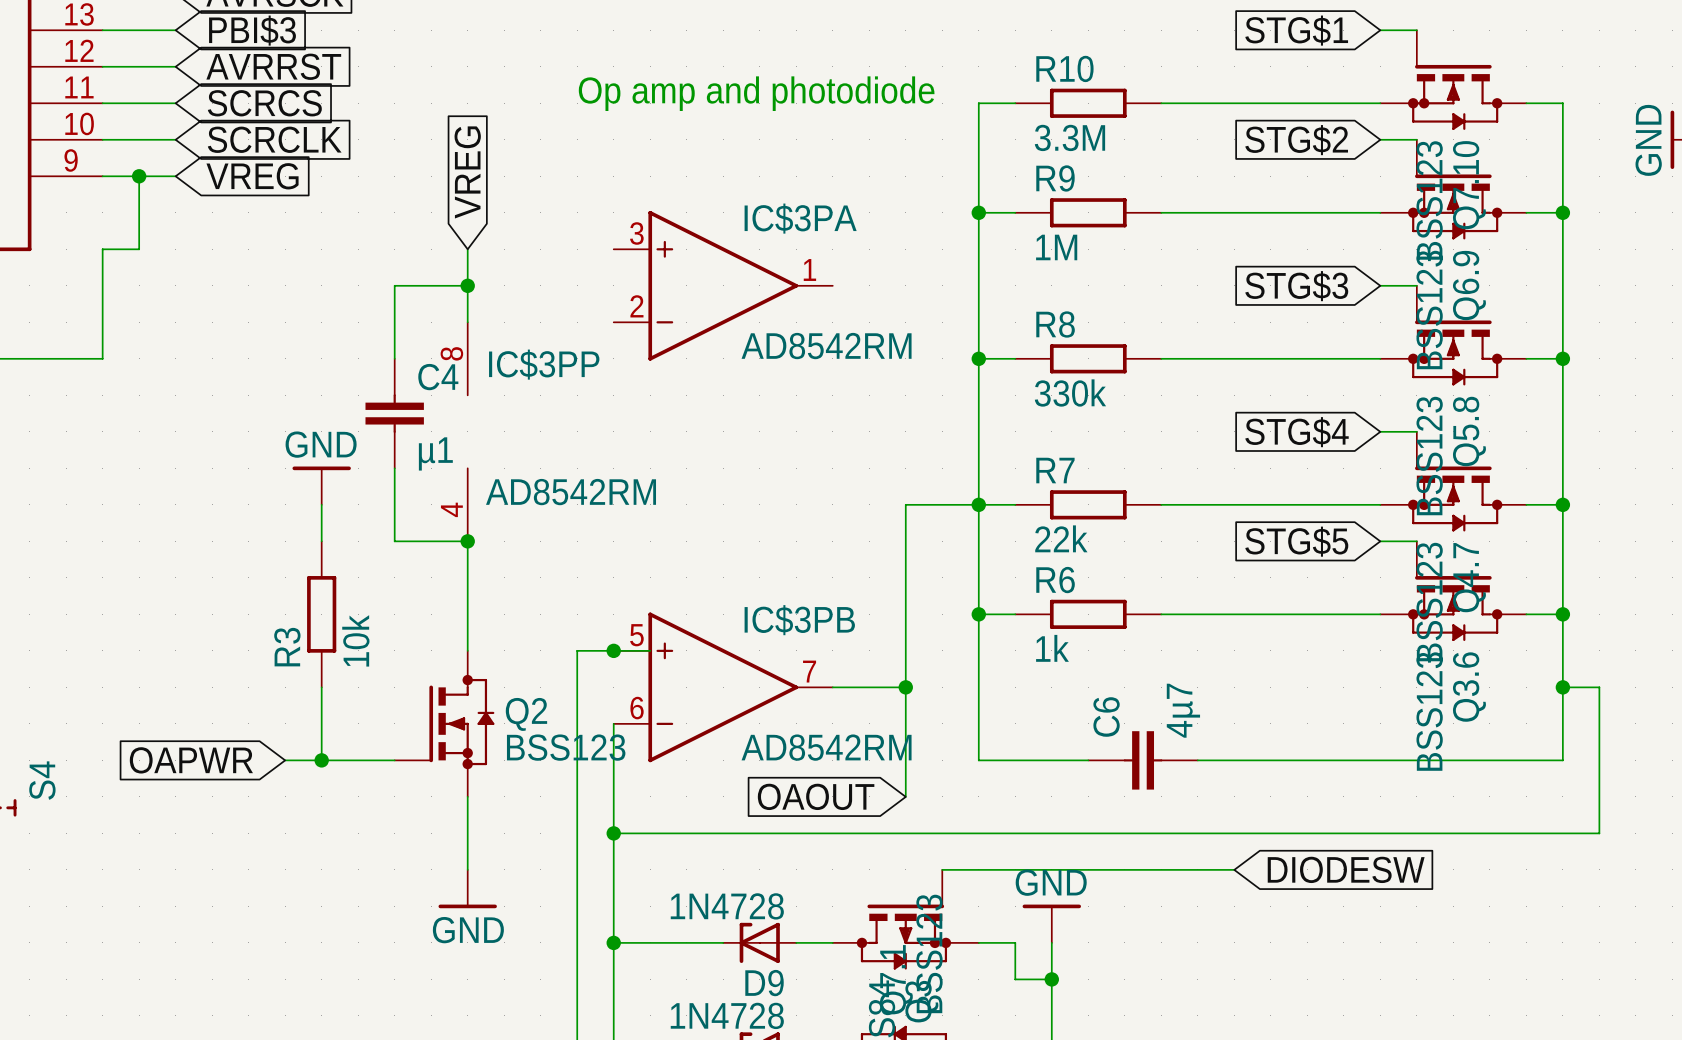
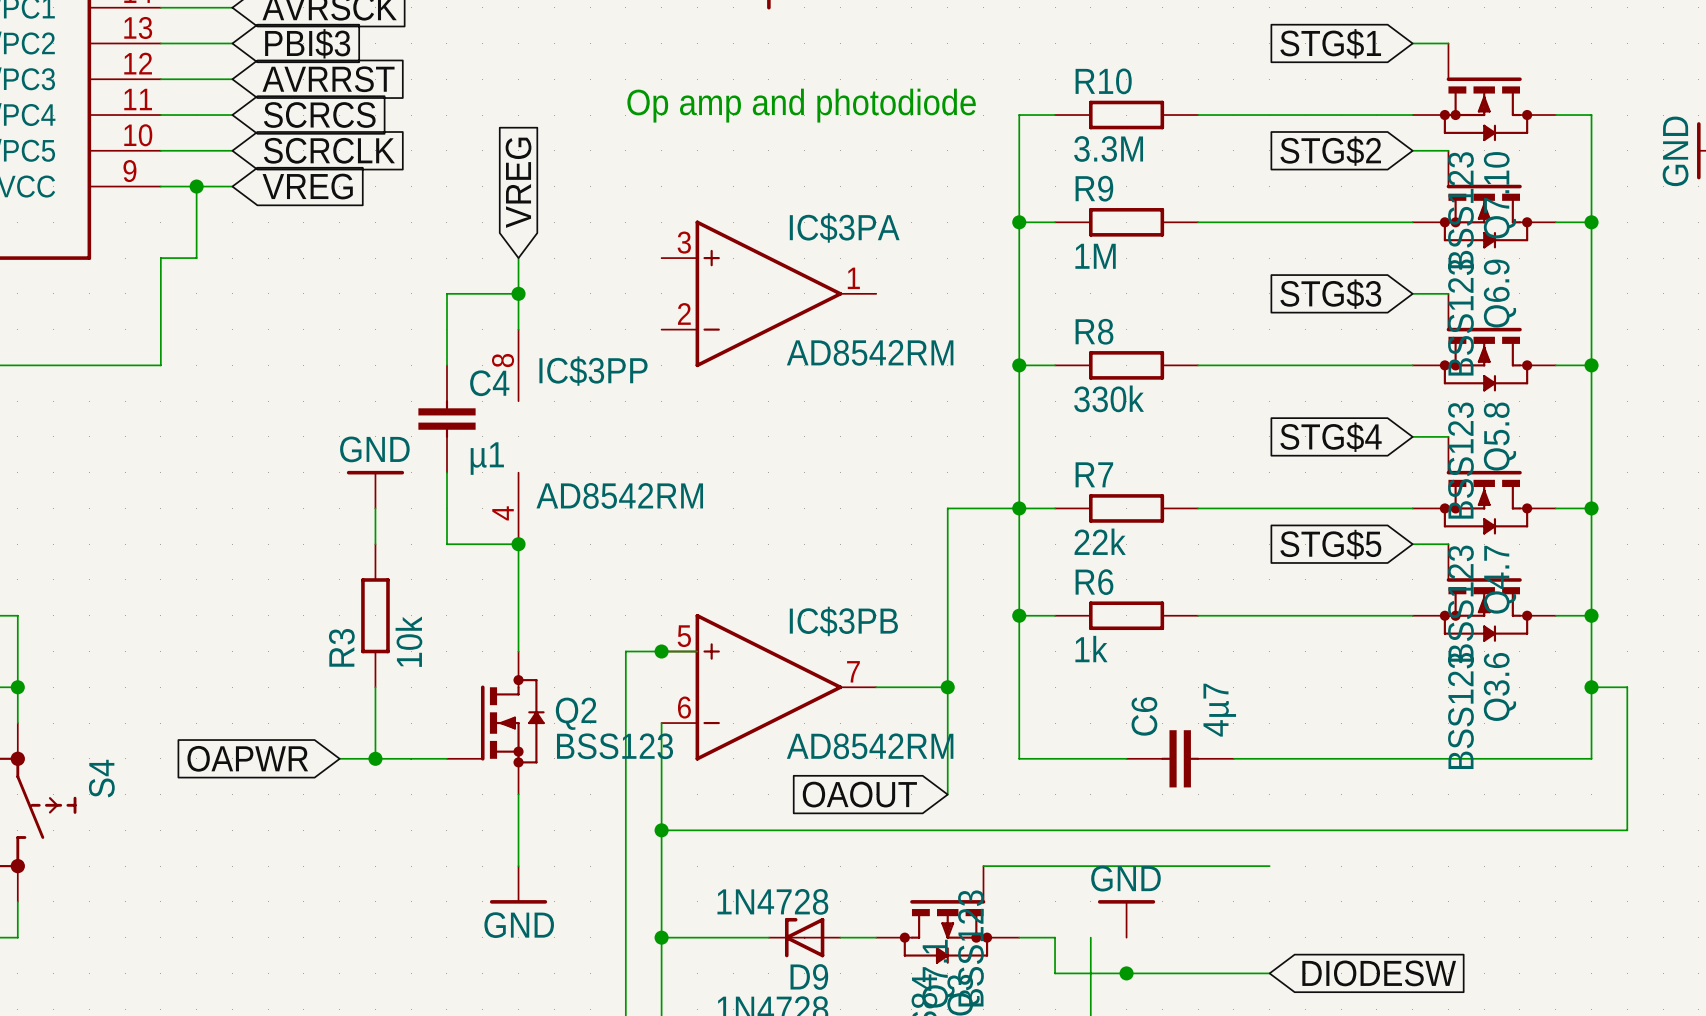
global label position: DIODESW (1346, 869) -> DIODESW (1379, 973)
power symbol position: GND (1051, 923) -> GND (1126, 918)
wire: none -> (1090, 973) (1269, 973)
junction position: (1051, 979) -> (1126, 973)

